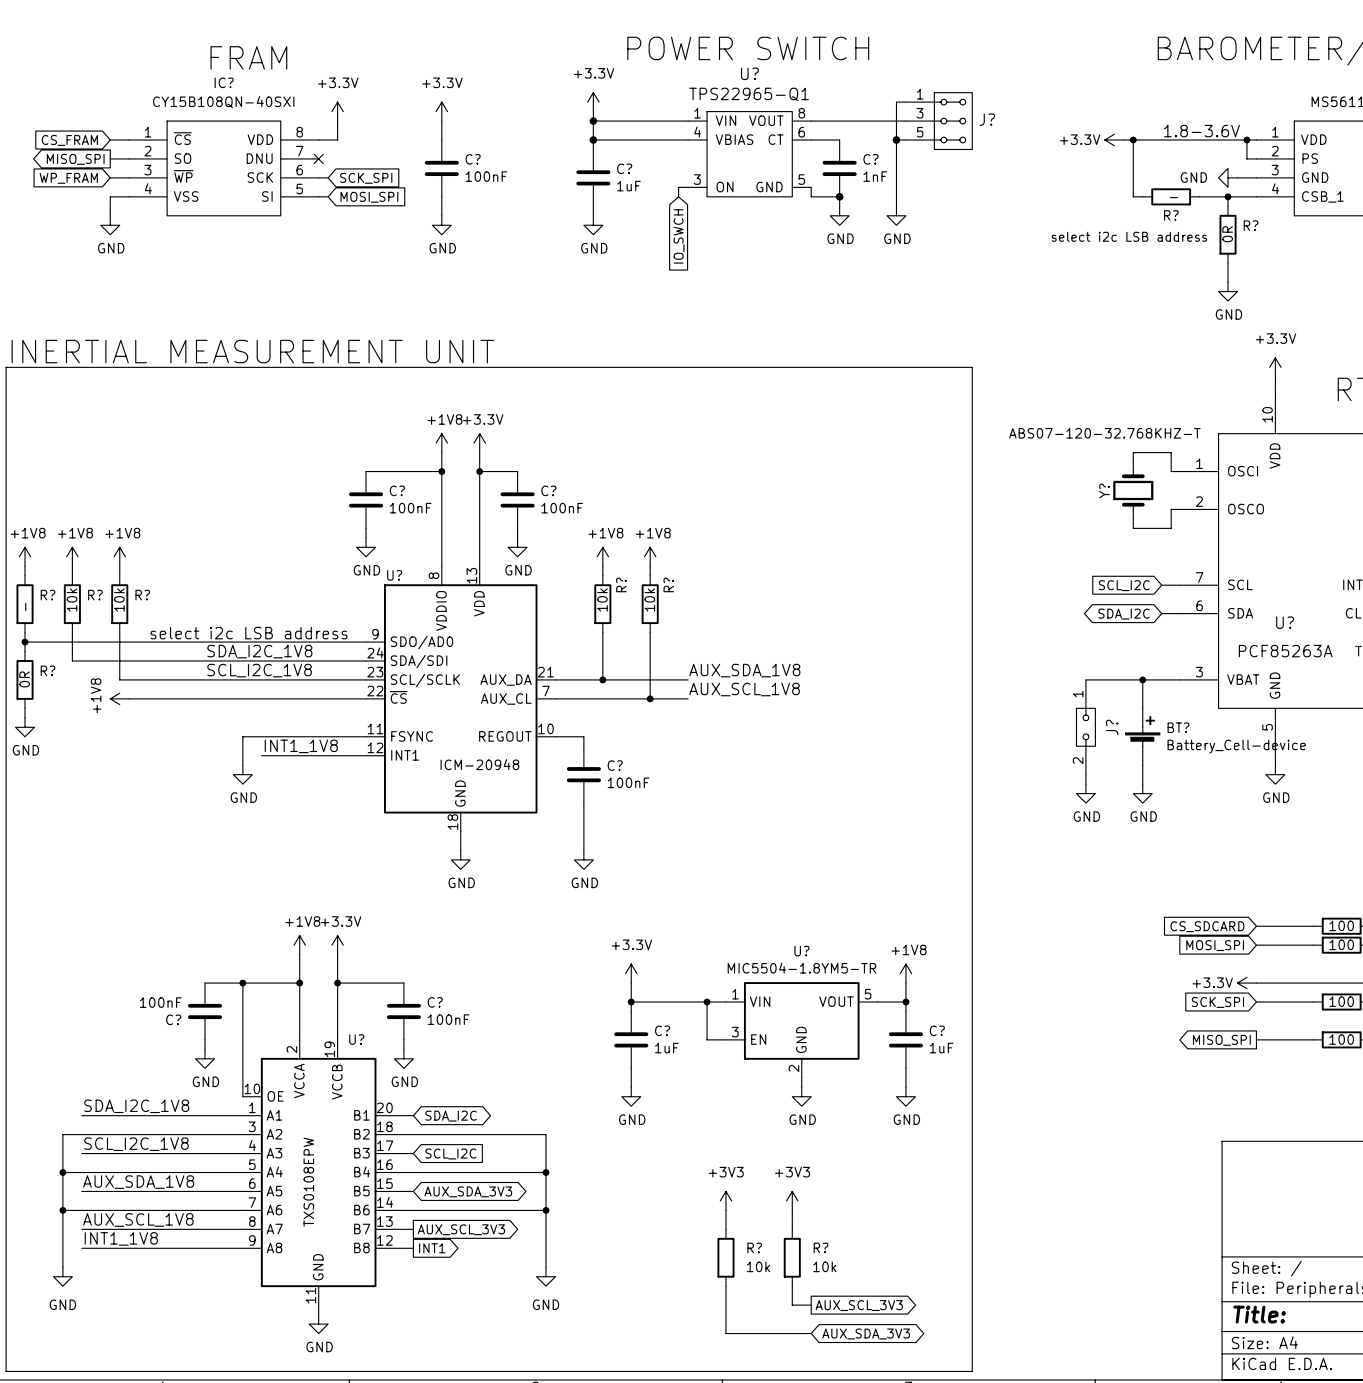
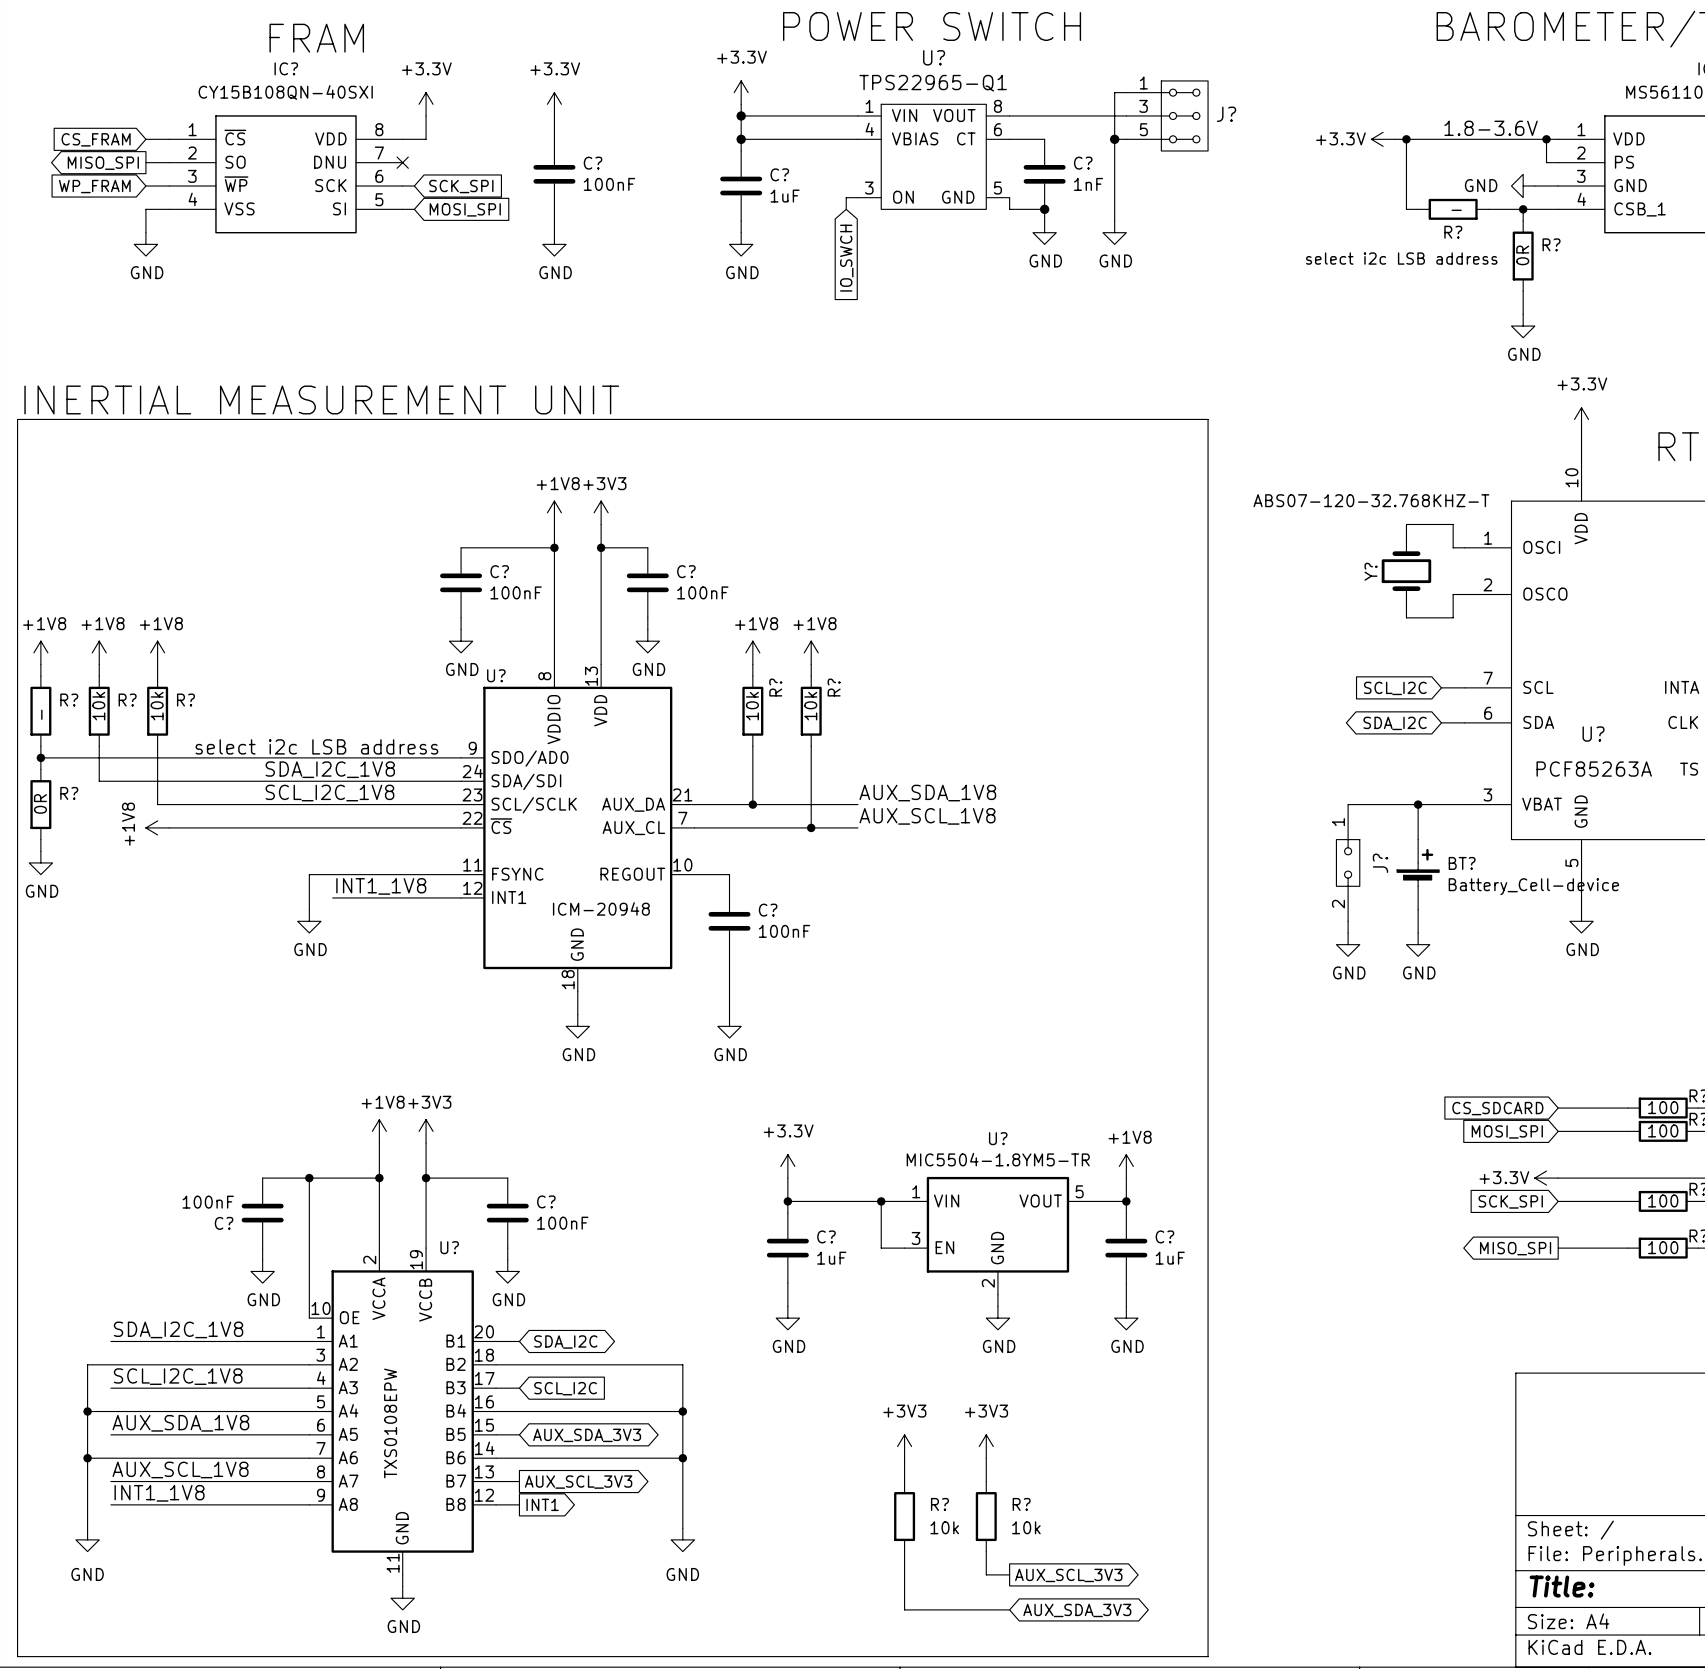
power symbol: +3.3V (479, 443) -> +3V3 (601, 512)
power symbol: +3.3V (337, 945) -> +3V3 (426, 1131)

